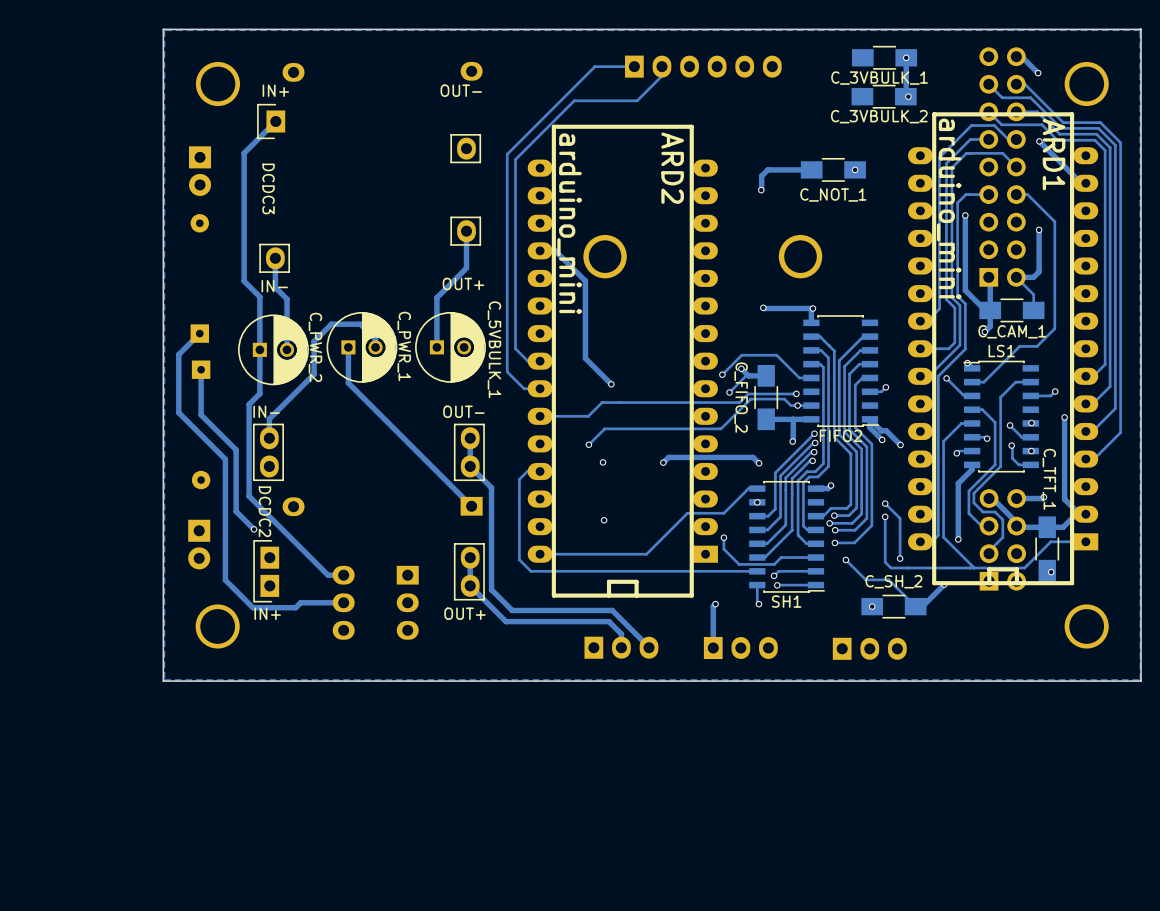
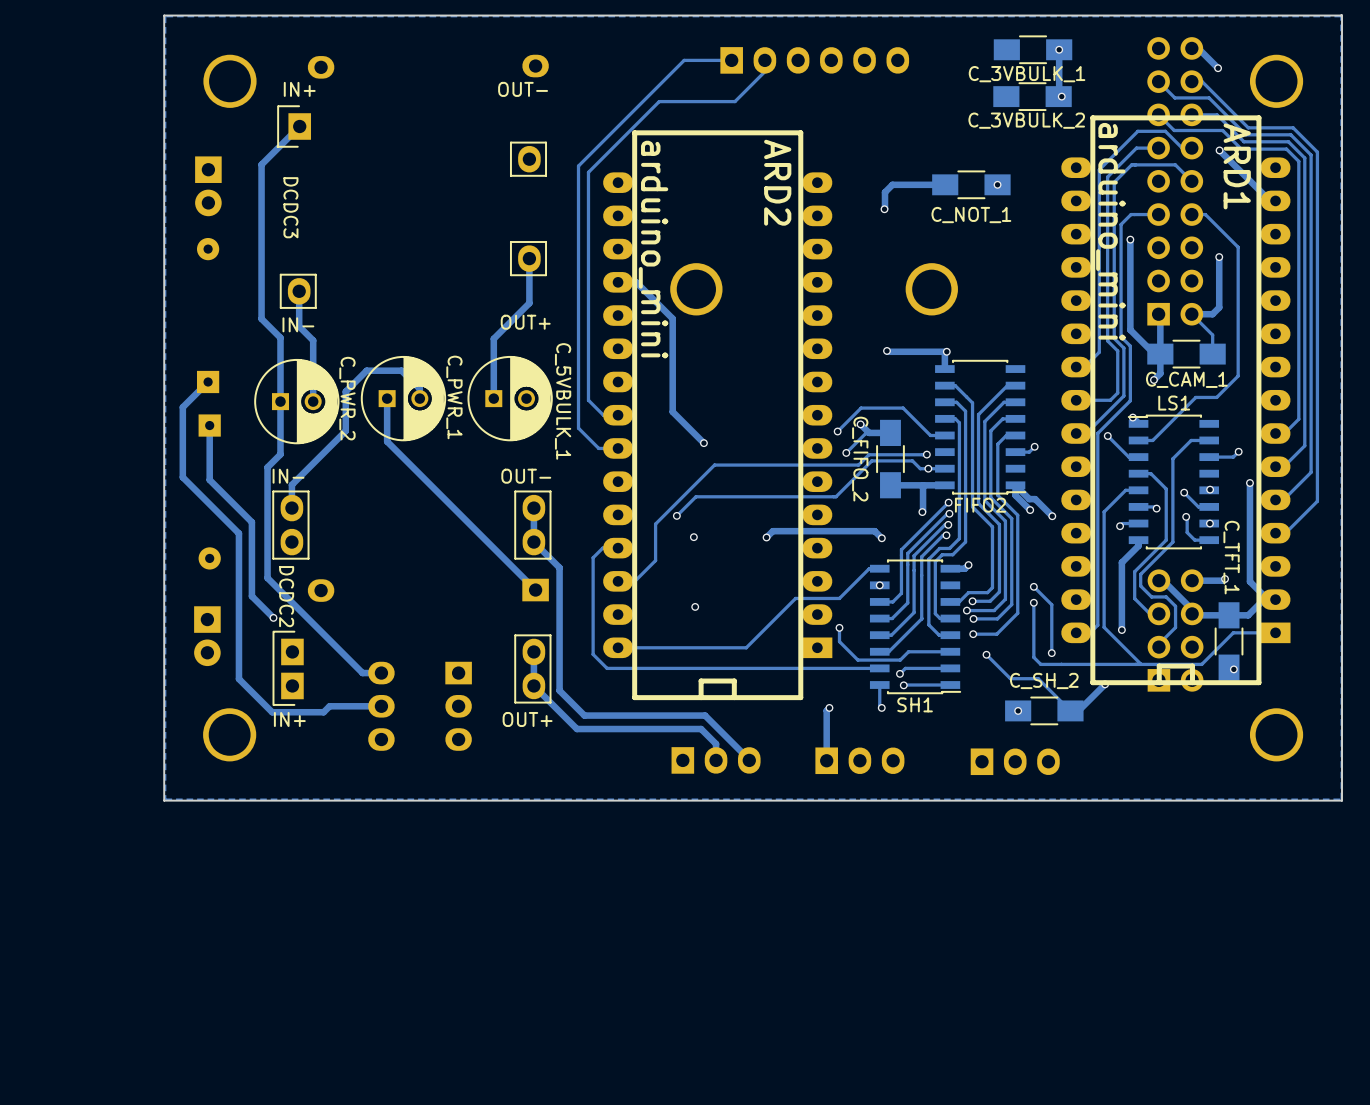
track: (620, 402) (602, 402) (588, 416) (540, 416) -> (714, 465) (655, 524) (655, 560) (634, 581) (618, 581)

